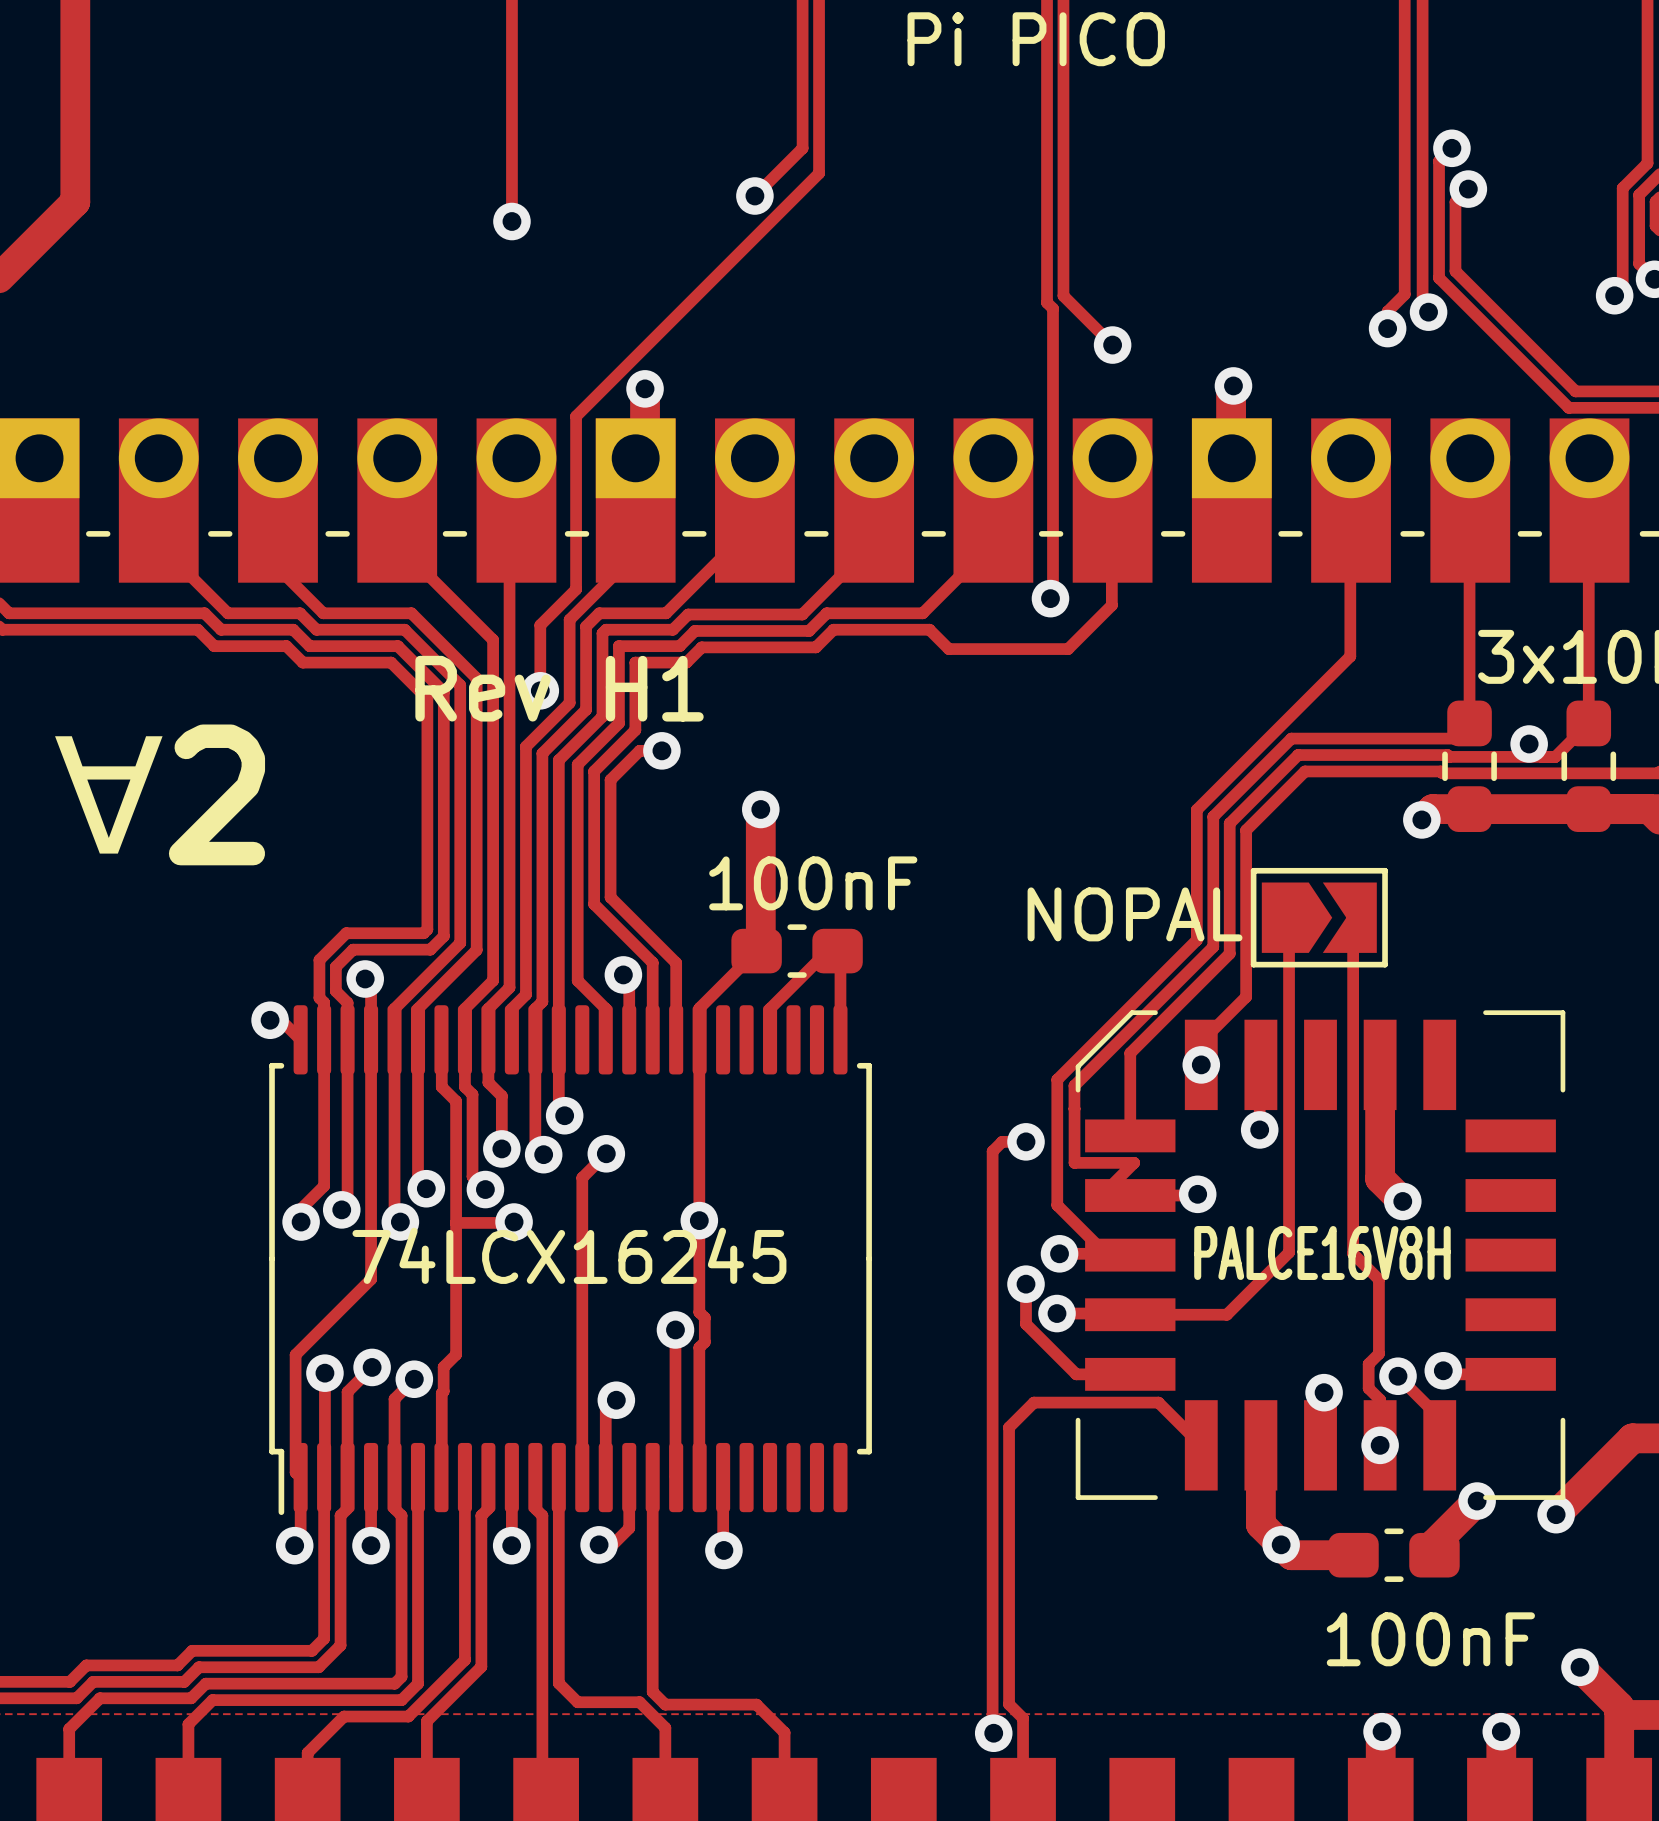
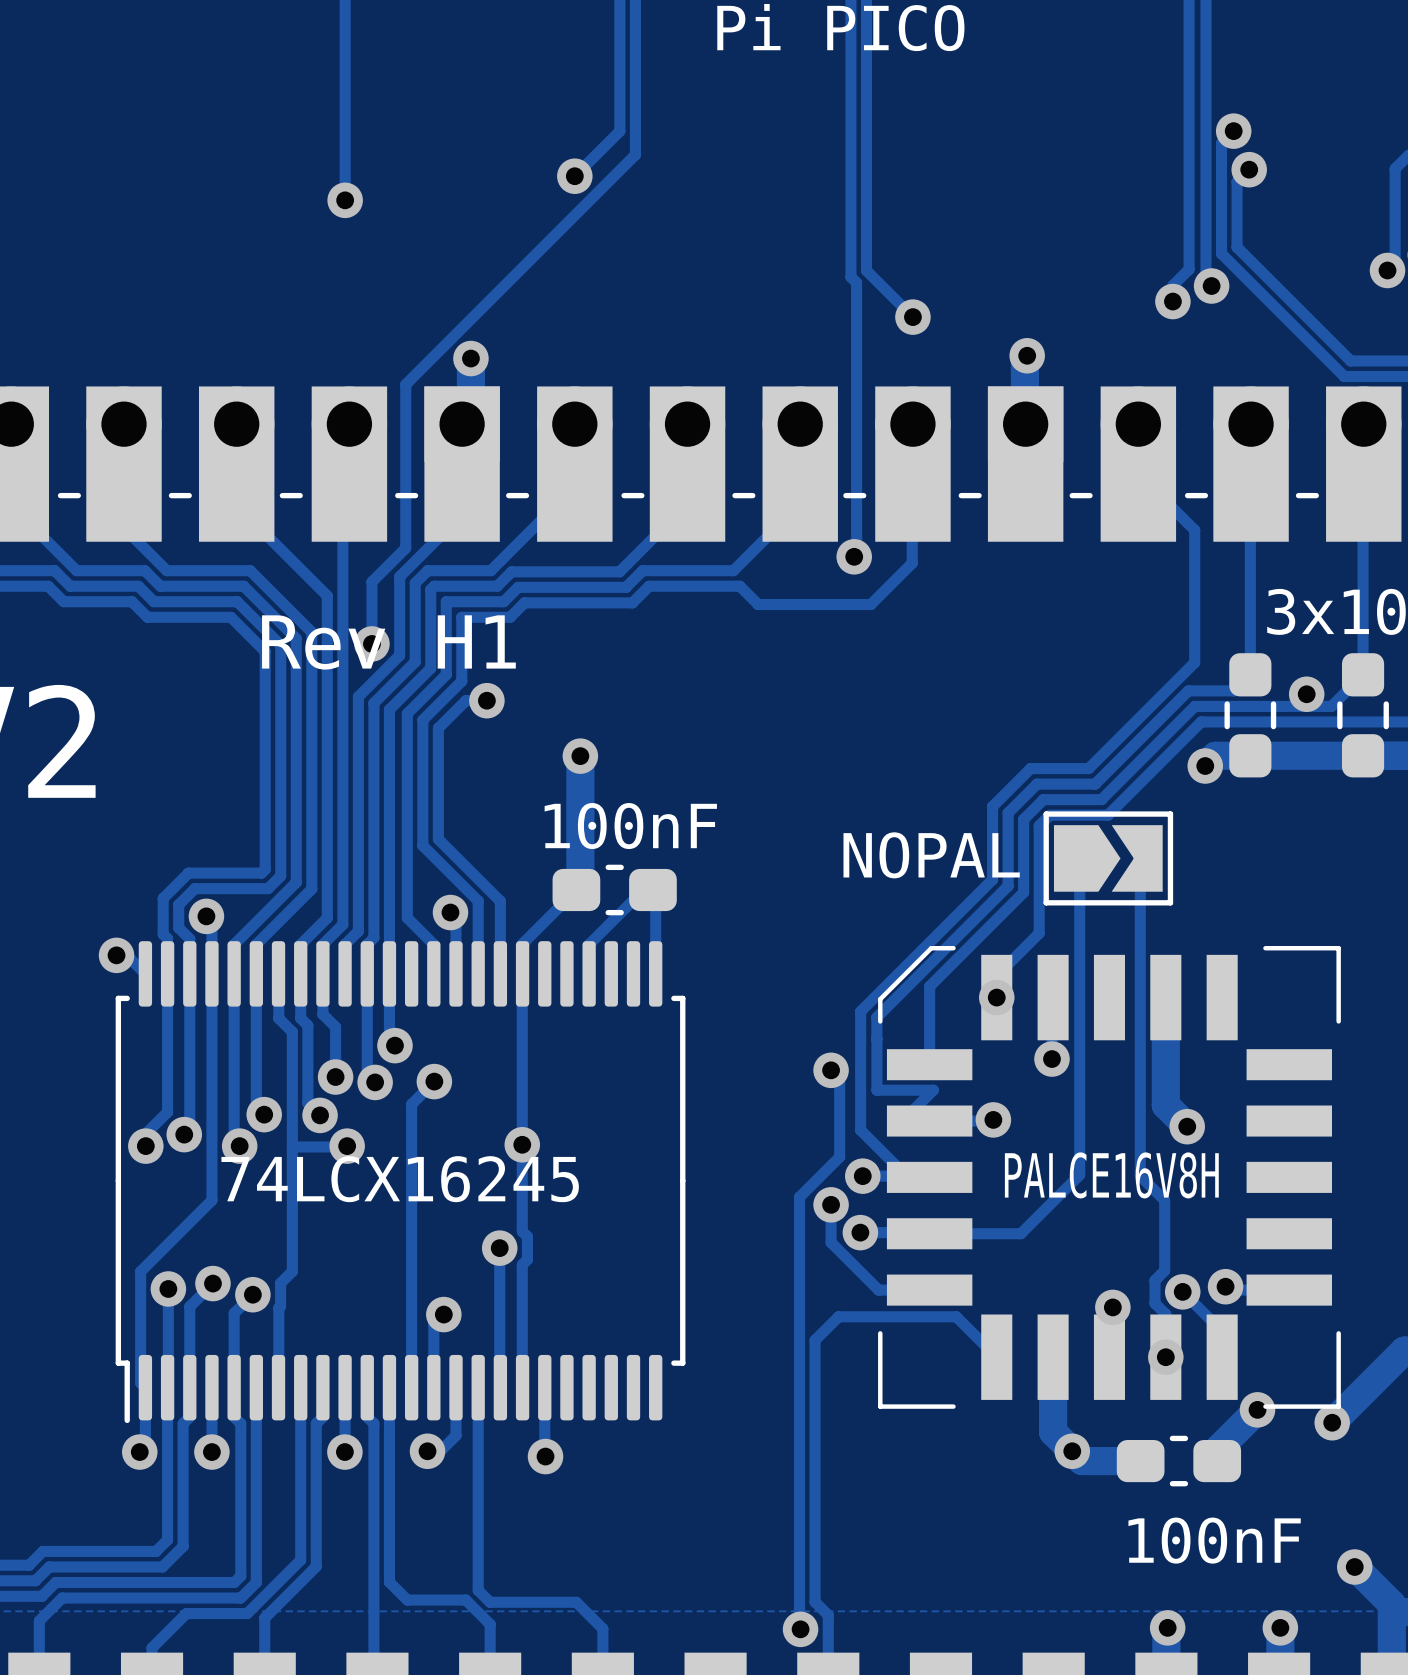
track: (1350, 510) (1350, 656) (1196, 809) (1196, 862) -> (1137, 473) (1194, 530) (1194, 662) (1088, 768) (1030, 768) (992, 806)
track: (1454, 738) (1291, 738) (1213, 816) (1213, 869) -> (1236, 689) (1234, 690) (1188, 690) (1095, 784) (1036, 784) (1008, 812)
track: (1449, 756) (1447, 755) (1298, 755) (1229, 823) (1229, 876) -> (1231, 706) (1194, 706) (1101, 799) (1043, 799) (1023, 819)
track: (1442, 773) (1440, 771) (1304, 771) (1246, 830) (1246, 883) -> (1224, 721) (1201, 721) (1108, 815) (1049, 815) (1039, 825)
track: (1026, 1141) (1002, 1141) (992, 1151) (992, 1276) -> (831, 1070) (839, 1078) (839, 1157) (799, 1197)

